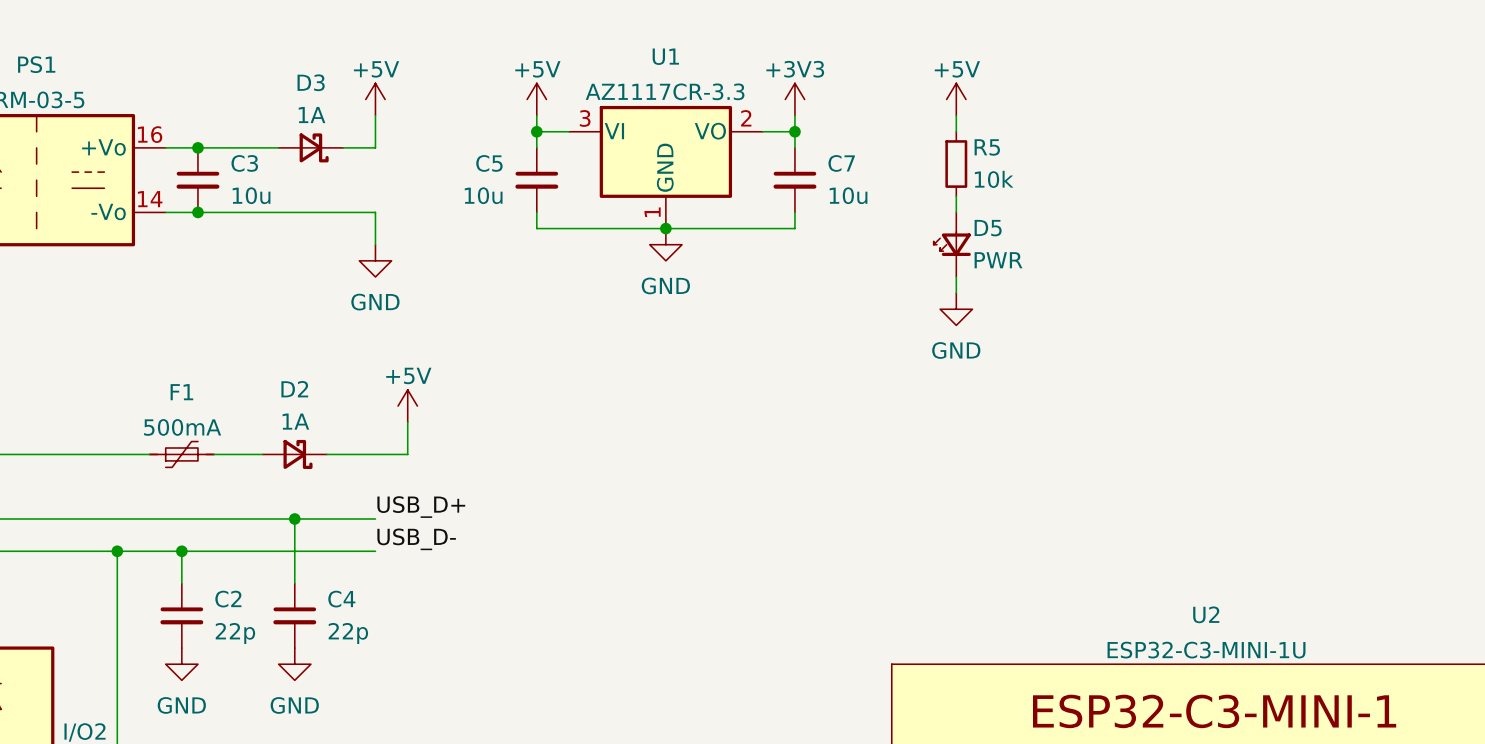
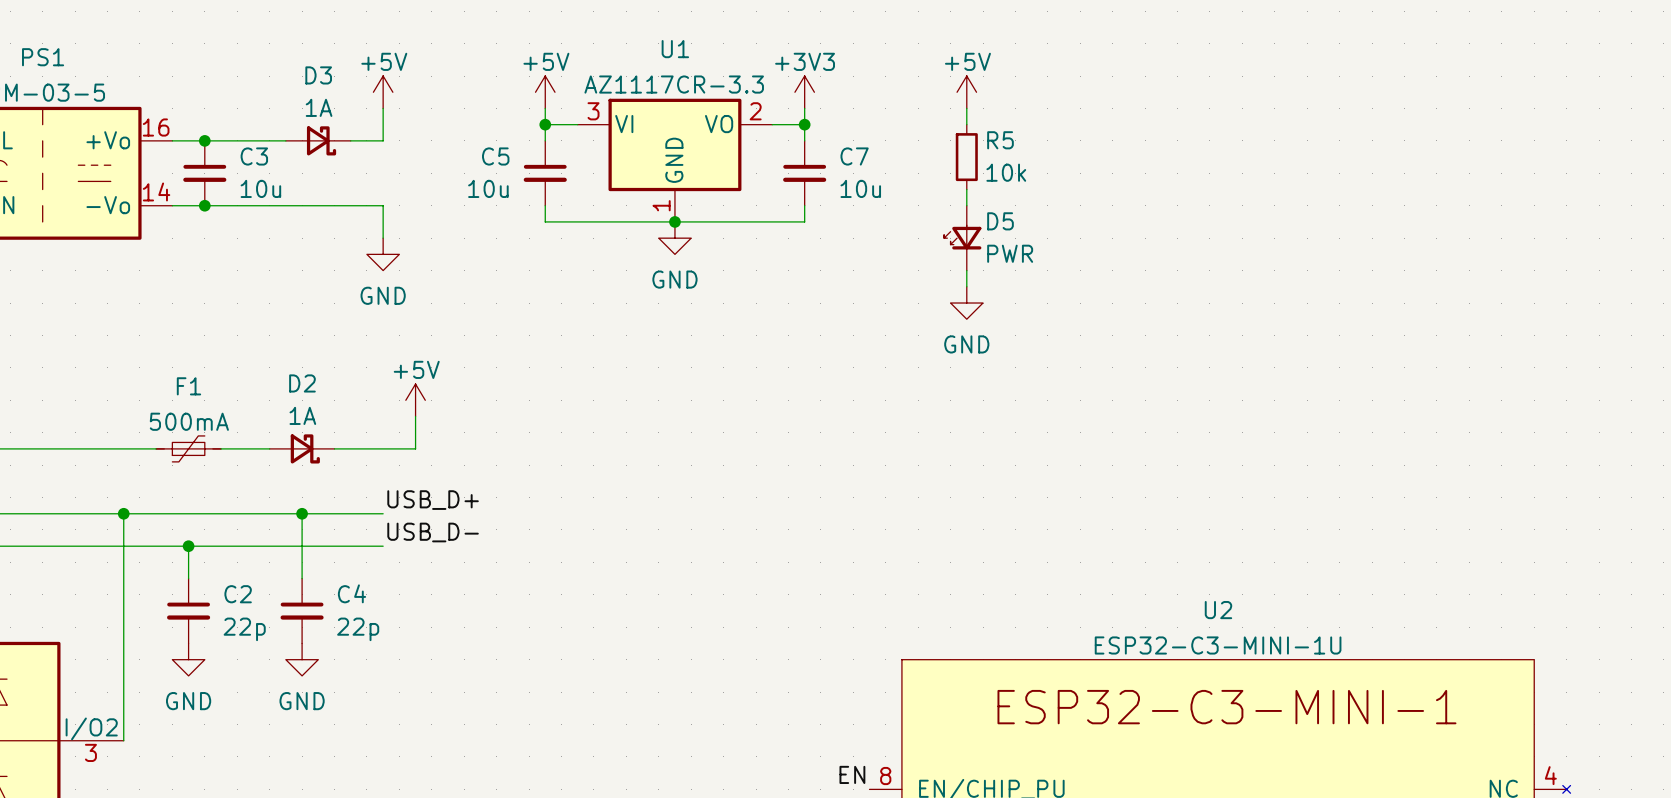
wire: none -> (123, 513) (123, 546)
junction position: (117, 551) -> (123, 513)

